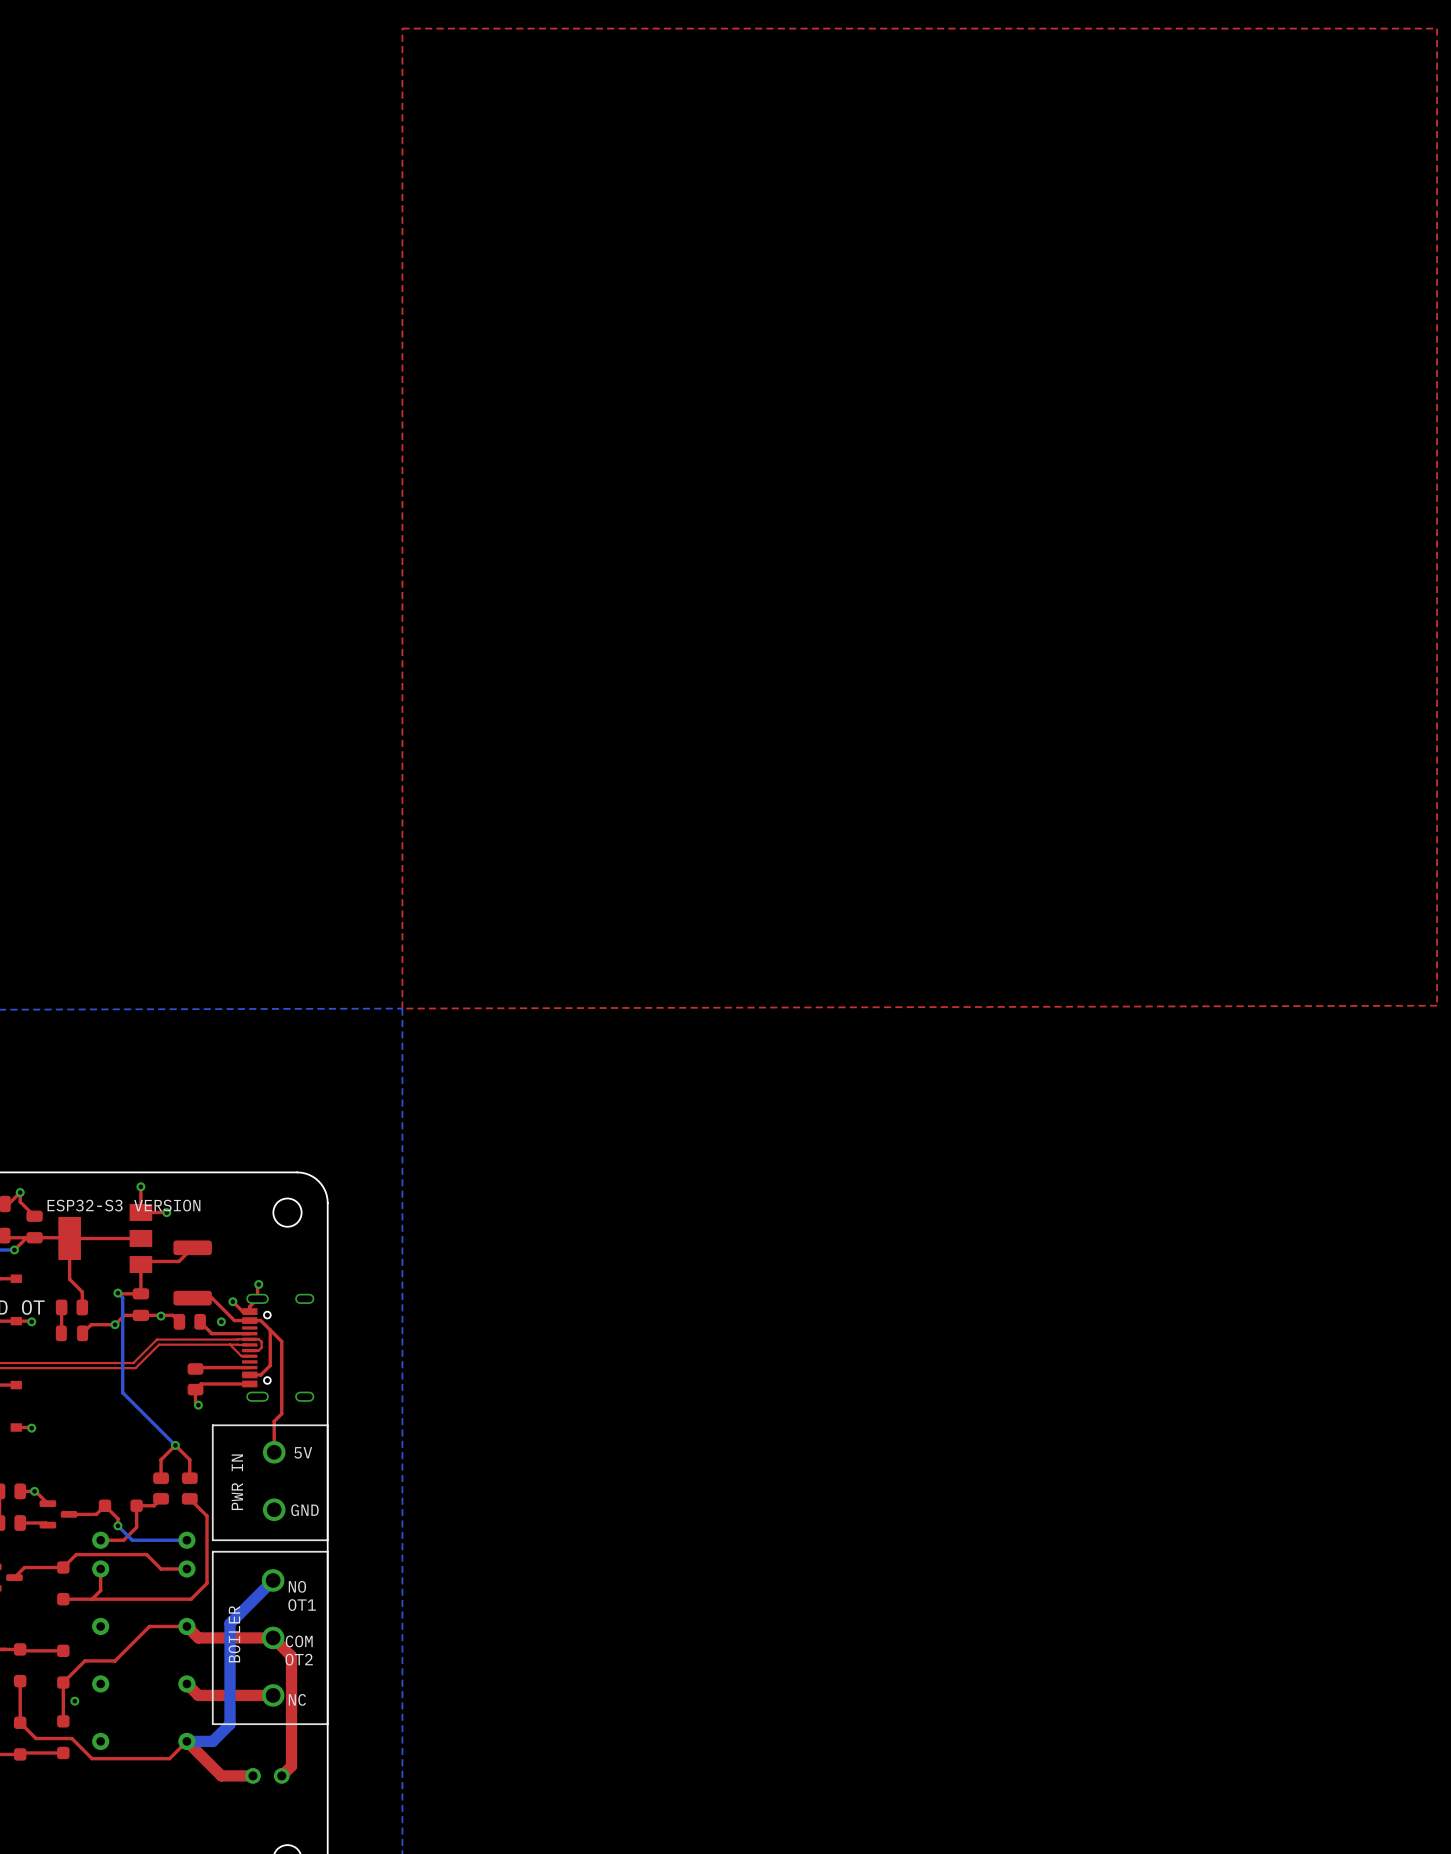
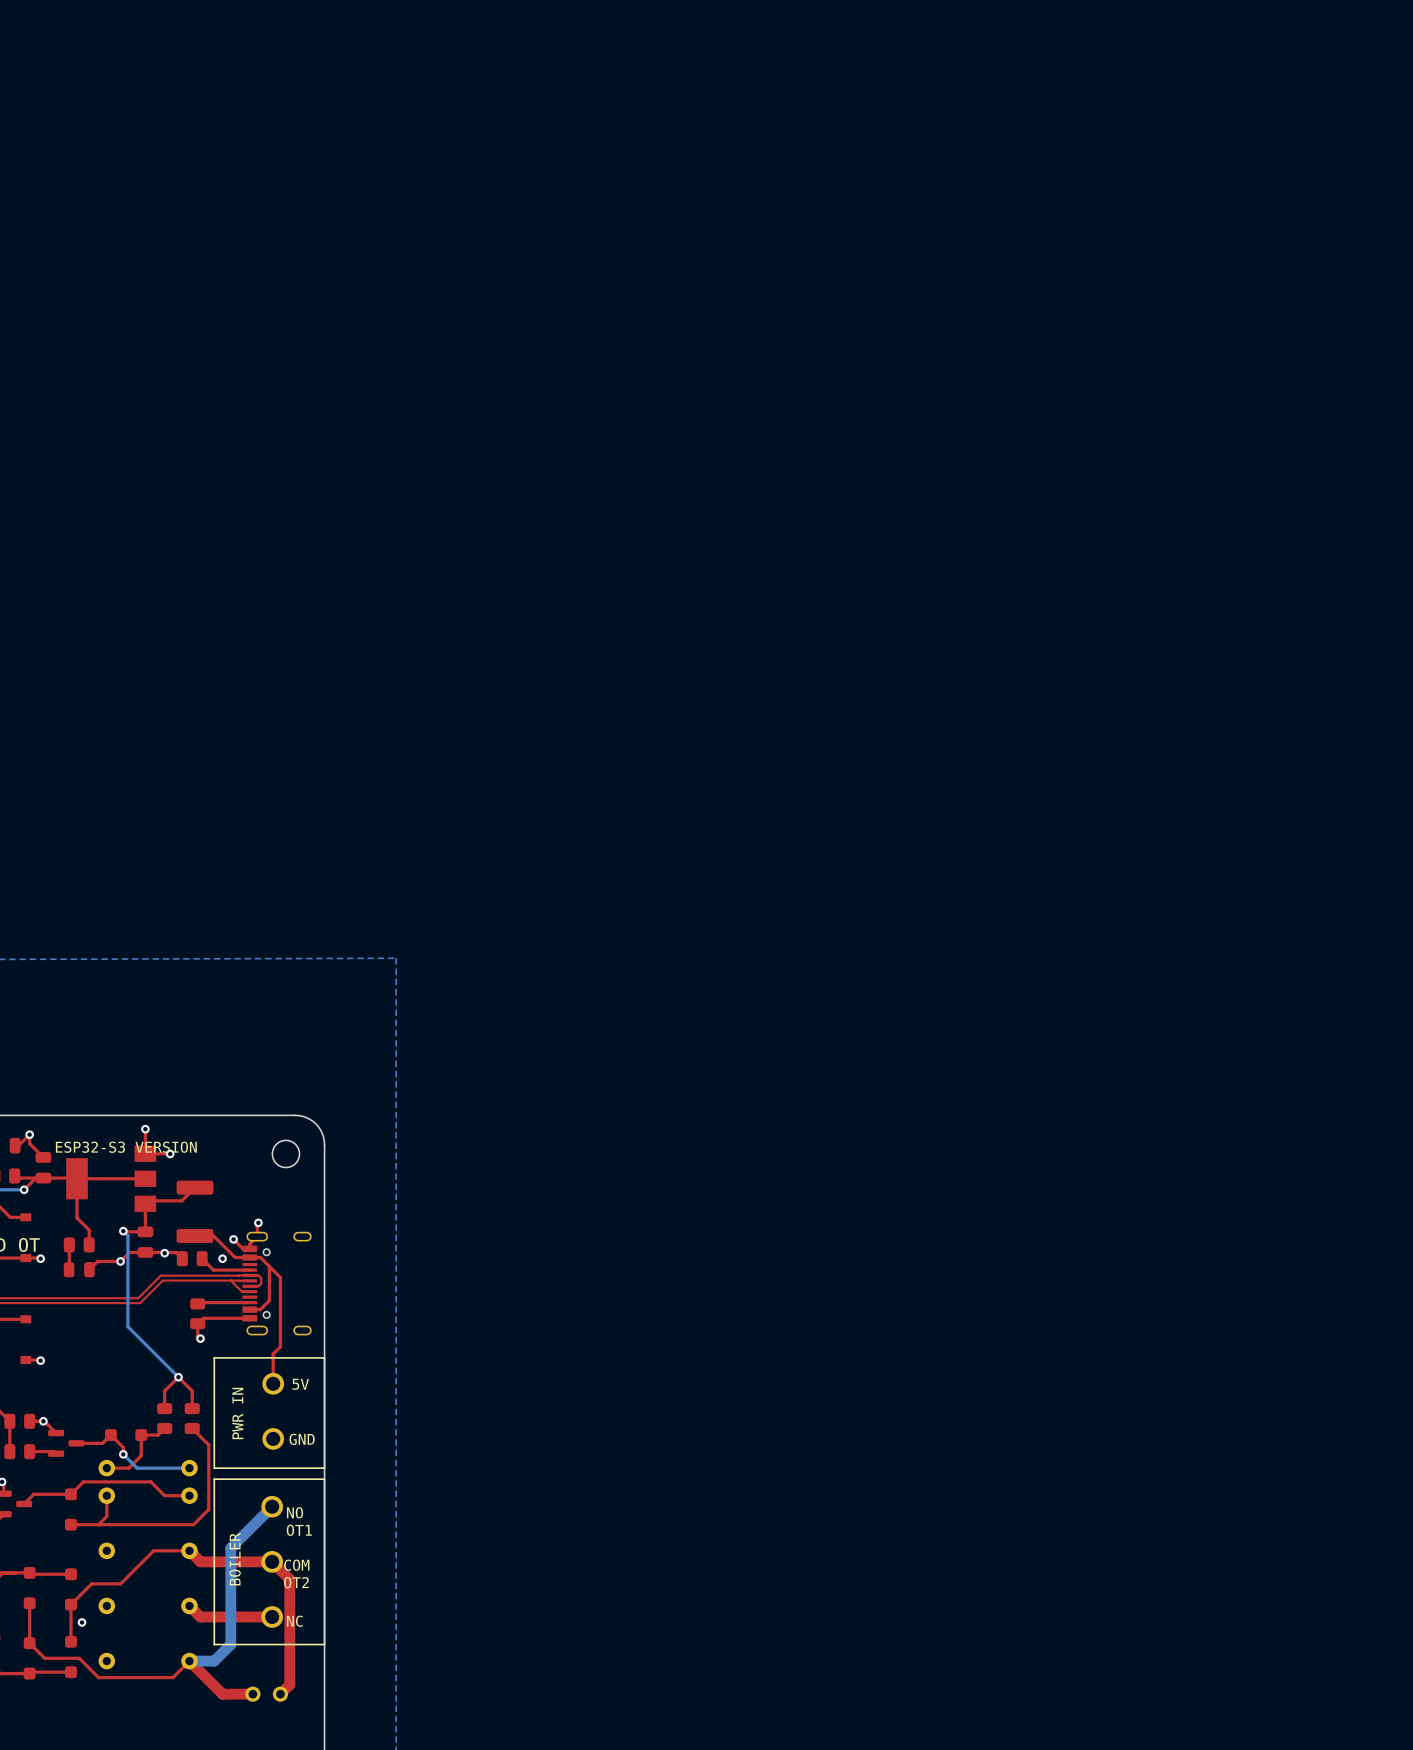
top zone outline: (1437, 28) (402, 28) (402, 1008) (1437, 1005) (1437, 28) -> none

